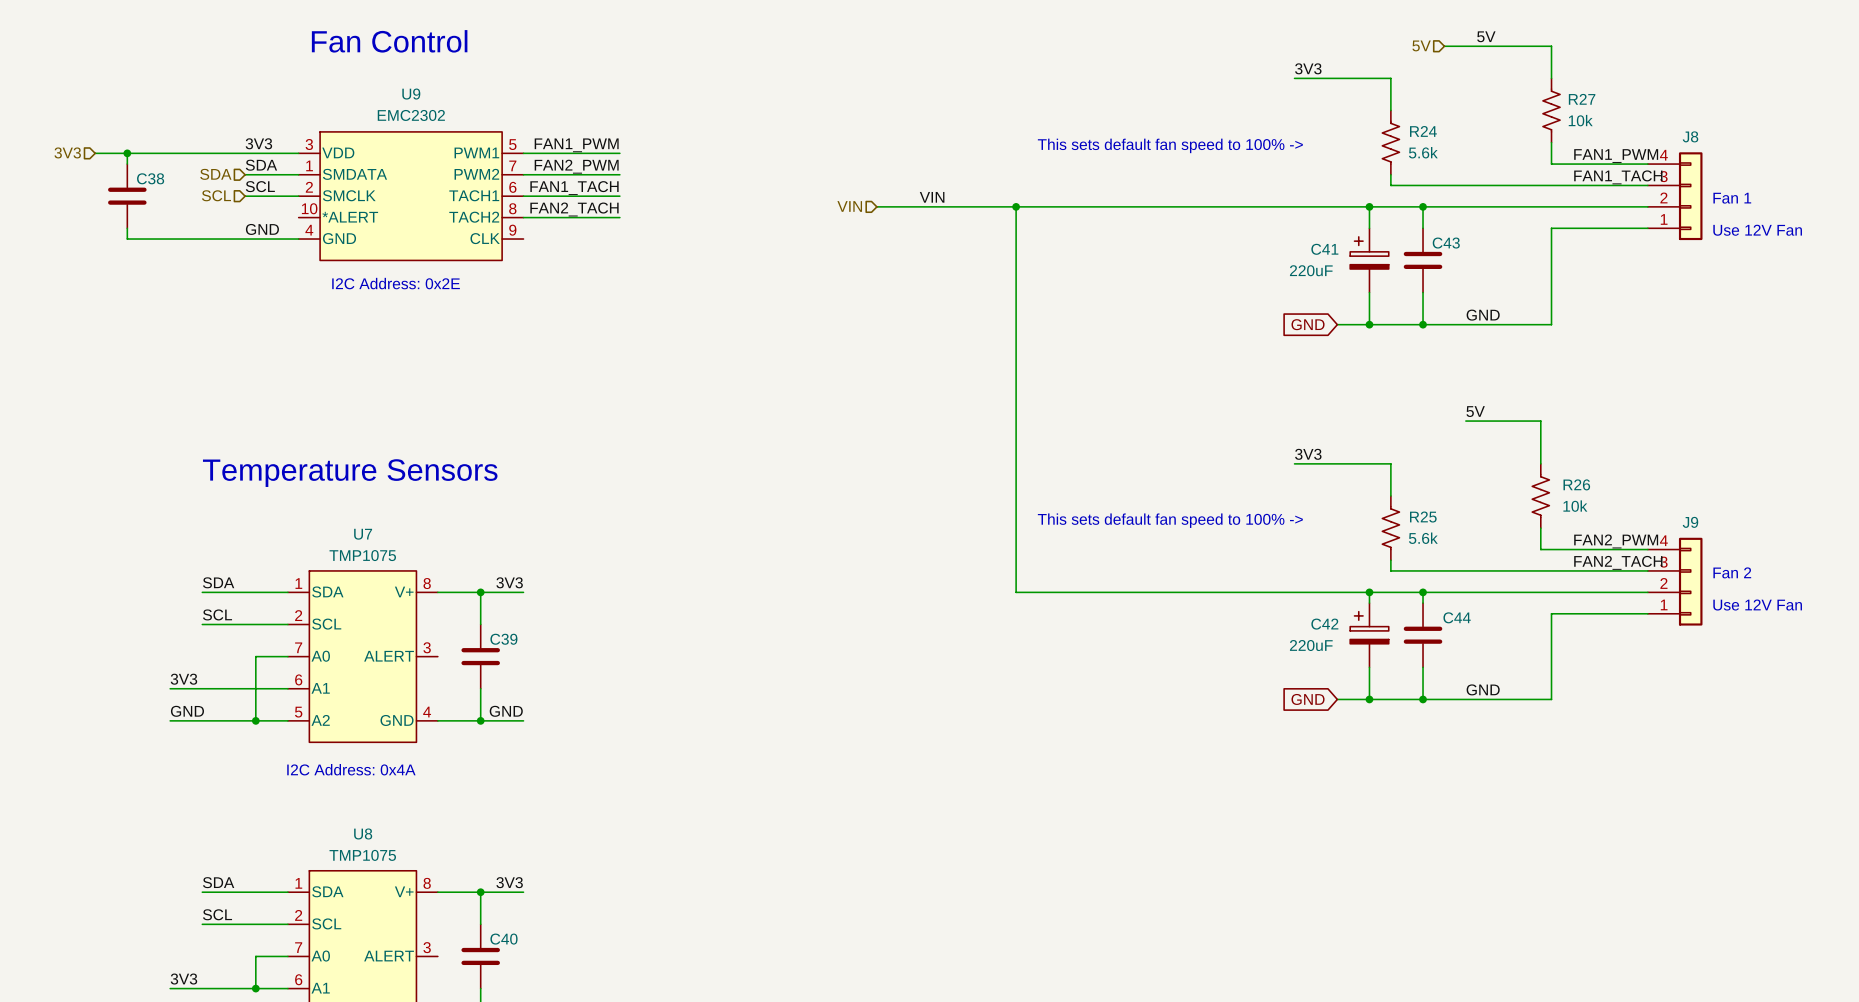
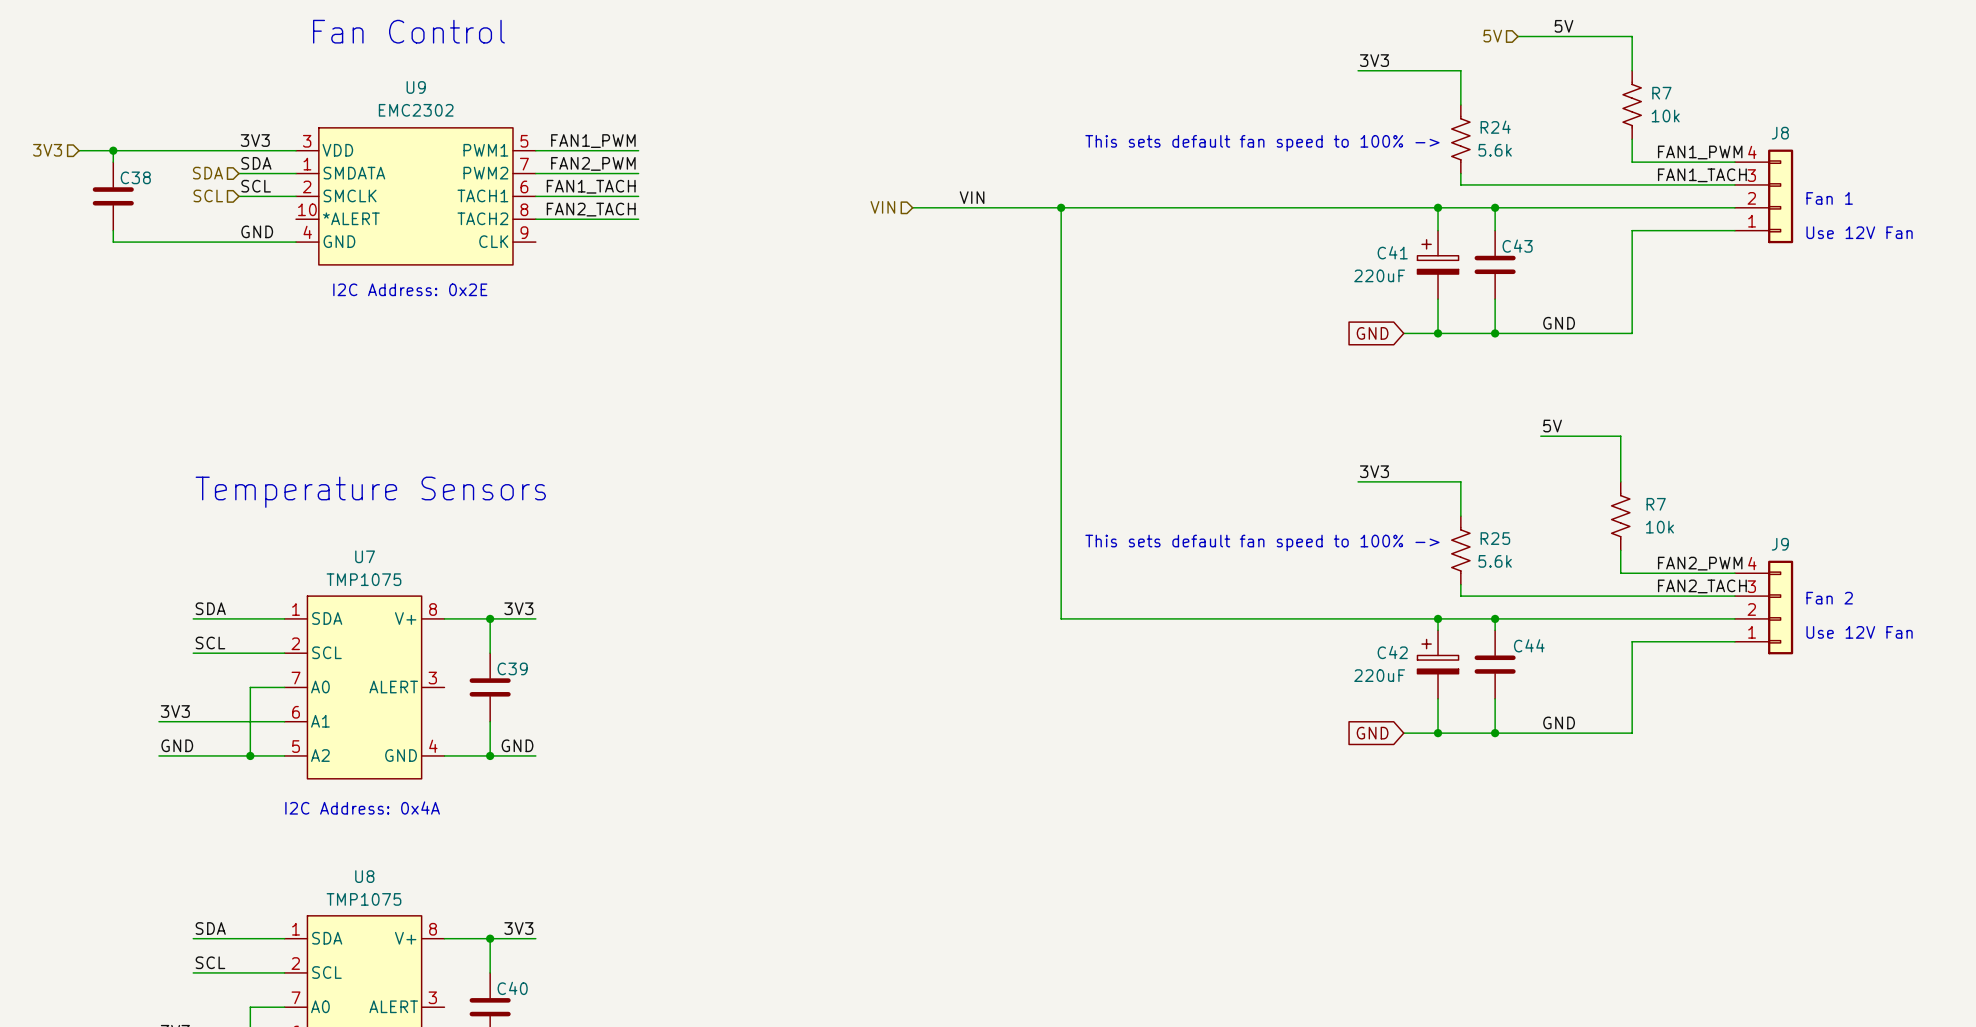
R27 name: R27 (1582, 99) -> R7 (1661, 93)
R26 name: R26 (1576, 484) -> R7 (1656, 504)

